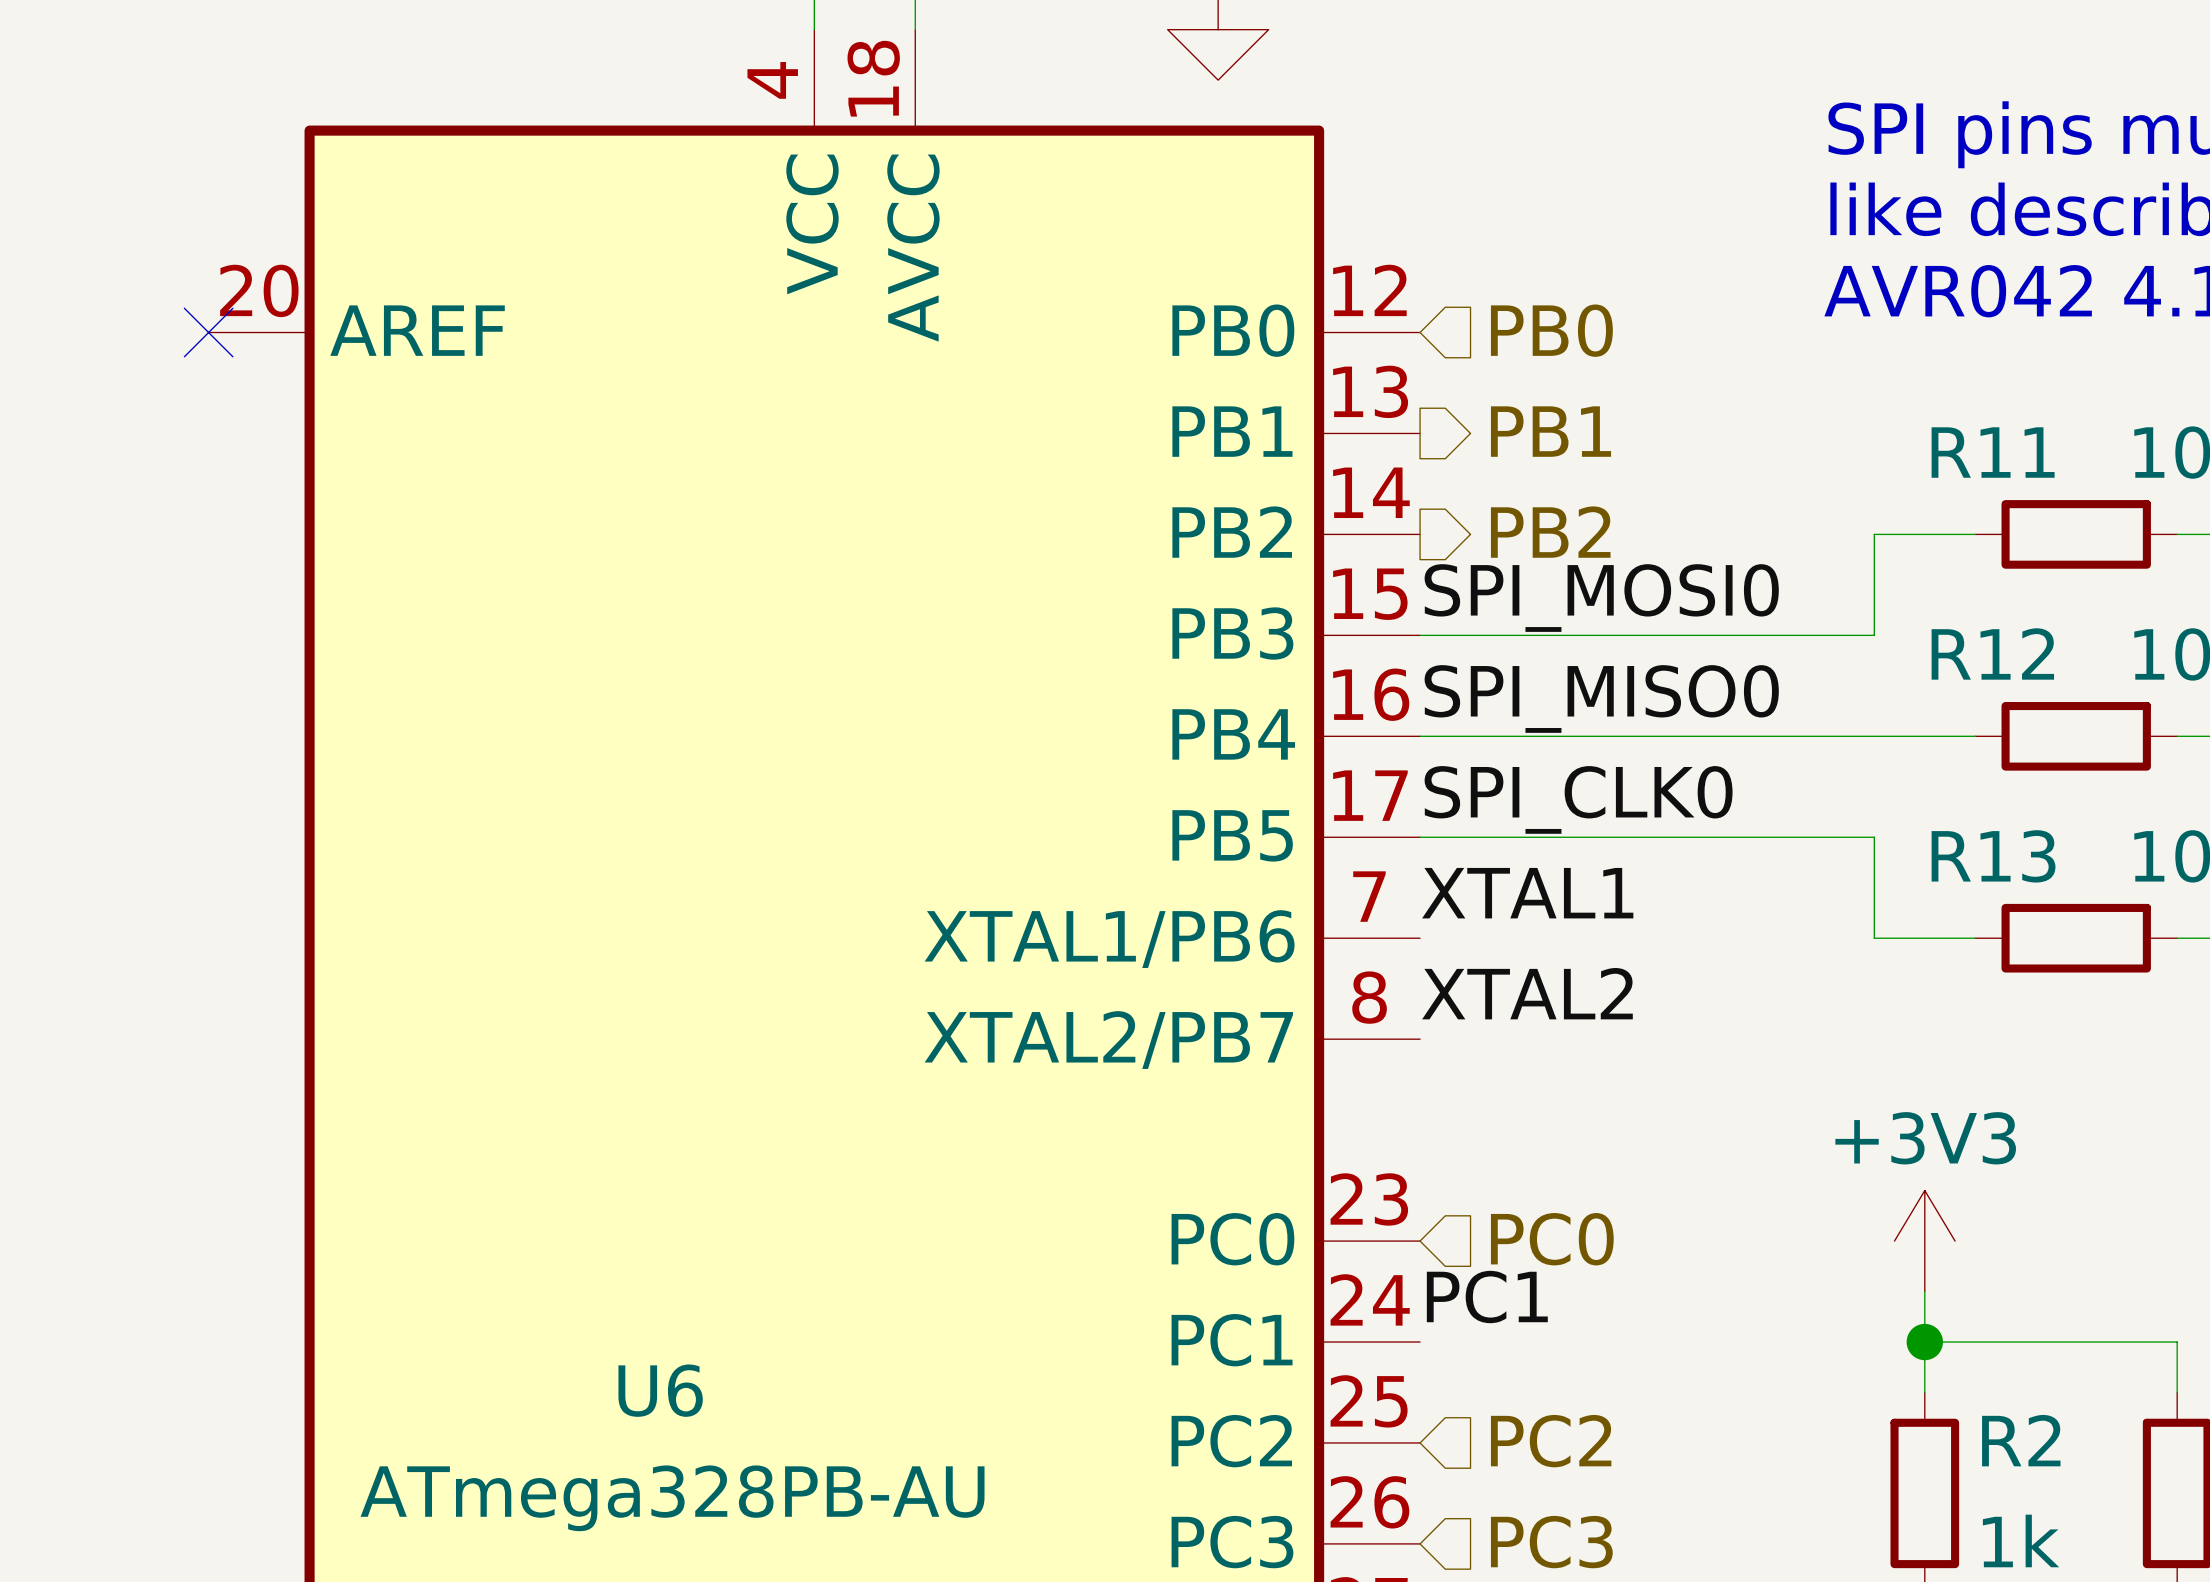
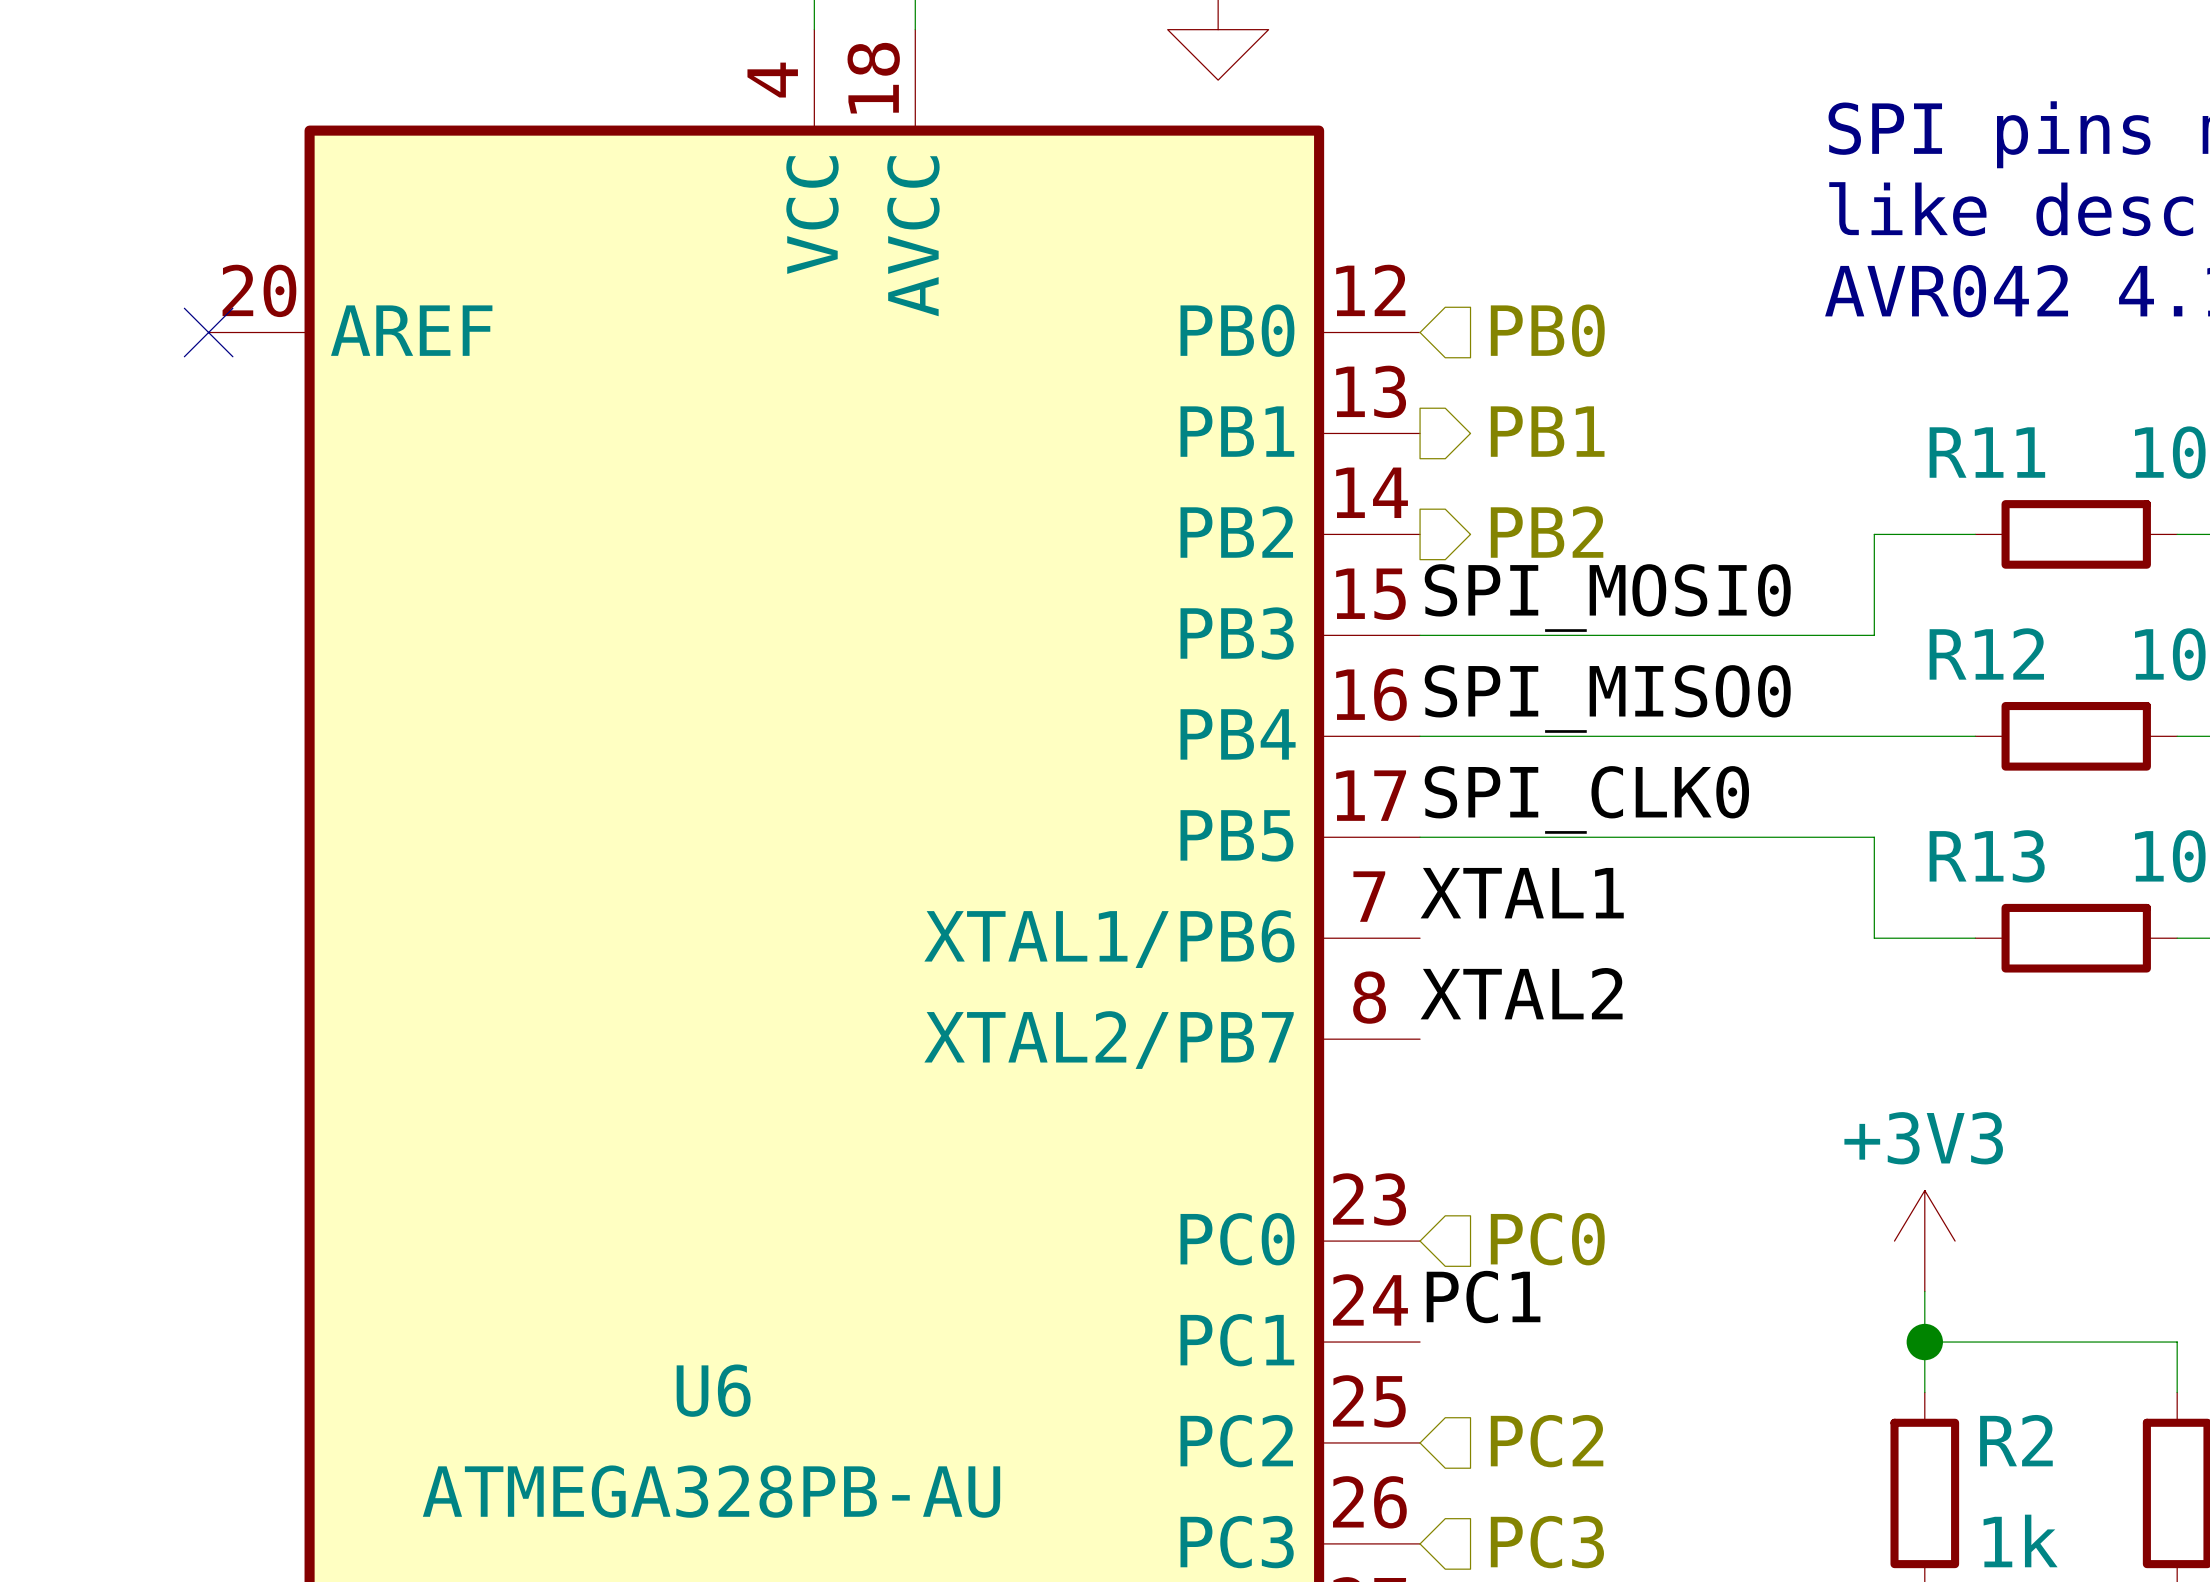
U6 name position: U6 (660, 1390) -> U6 (713, 1390)
U6 value: ATmega328PB-AU (672, 1498) -> ATMEGA328PB-AU (711, 1491)

